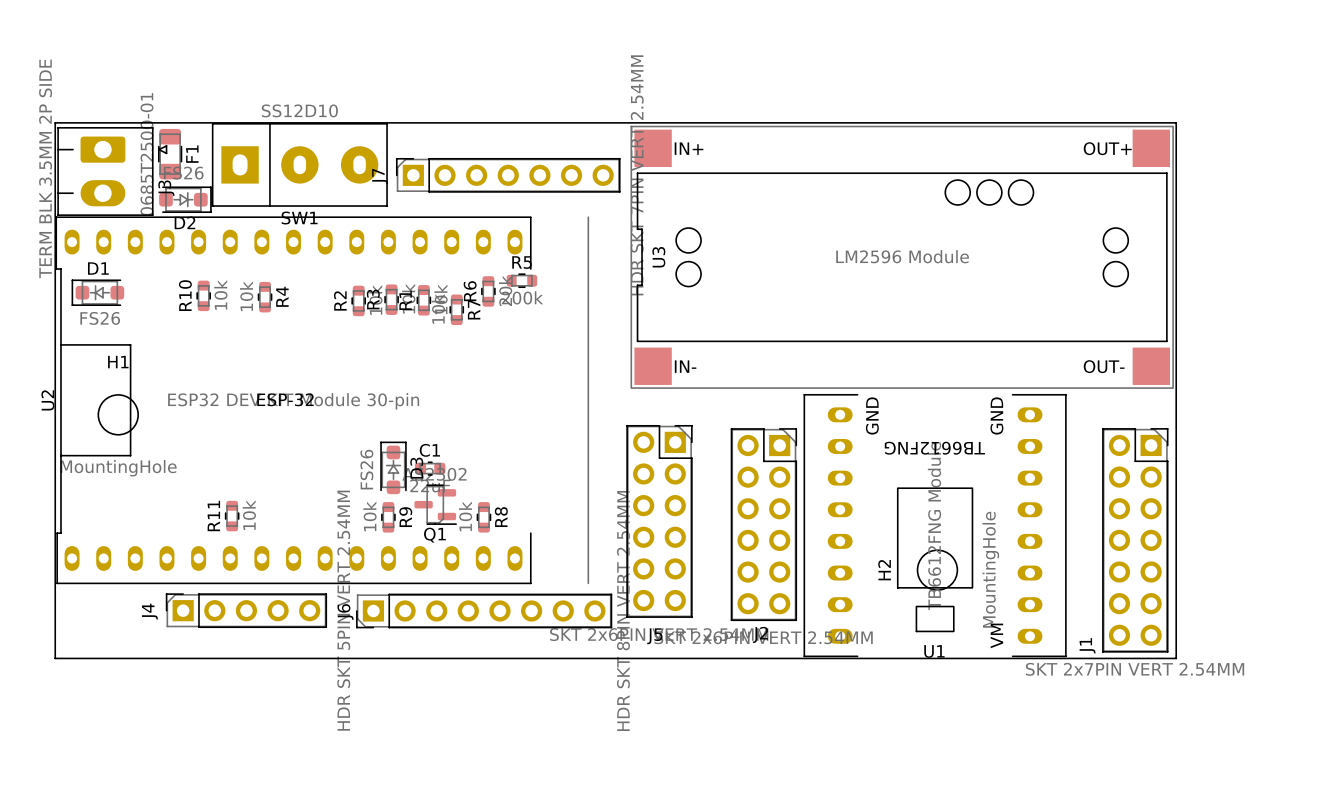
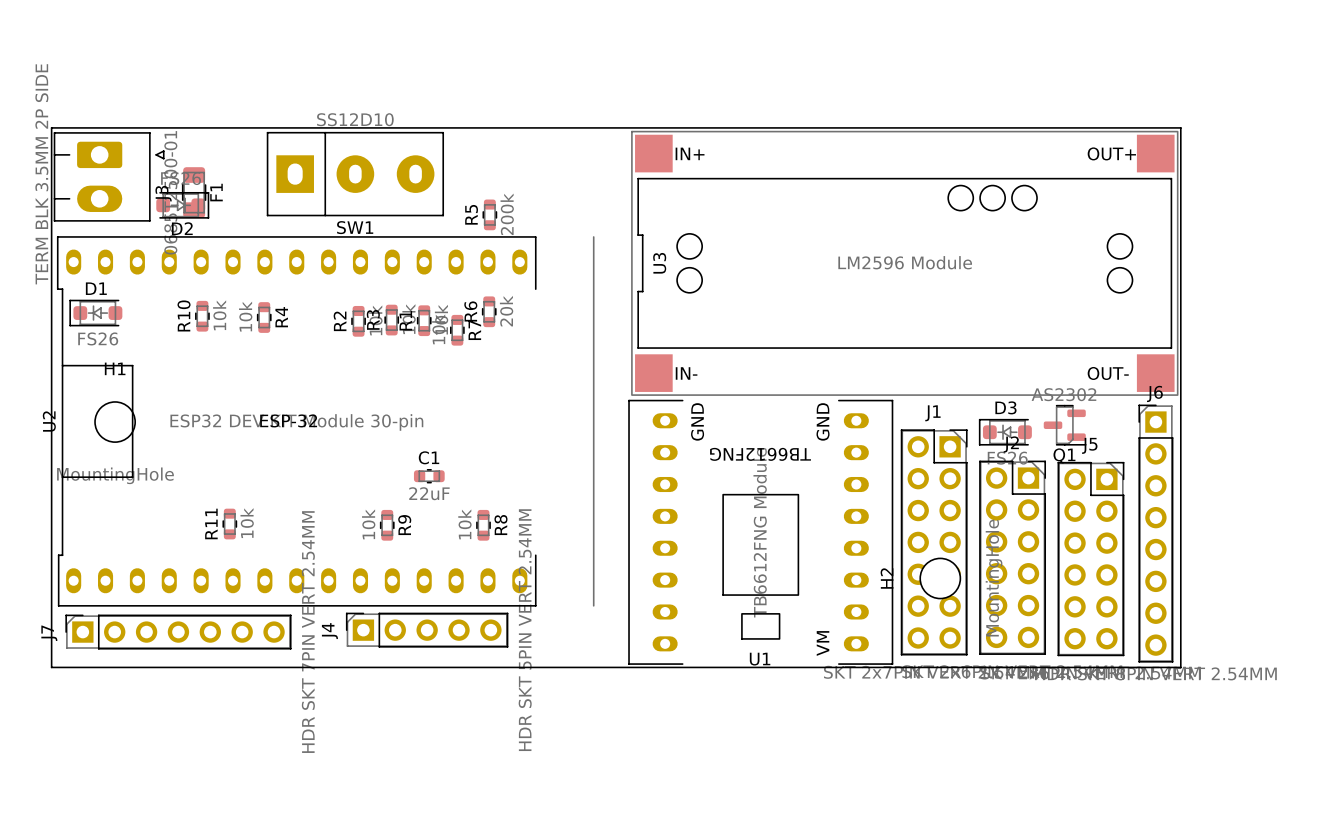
F1 position: (170, 154) -> (194, 192)
SW1 position: (299, 164) -> (355, 174)
J7 position: (508, 175) -> (178, 632)
R5 name position: R5 (522, 262) -> R5 (471, 214)
R5 rotation: 0° (521, 280) -> 90° clockwise (489, 214)
R5 position: (521, 280) -> (489, 214)
R6 position: (488, 291) -> (489, 311)
D1 position: (97, 292) -> (95, 313)
R10 position: (203, 295) -> (202, 316)
R4 position: (265, 297) -> (264, 317)
R5 value position: 200k (522, 297) -> 200k (507, 214)
R3 position: (391, 299) -> (391, 320)
R2 position: (358, 300) -> (358, 321)
R1 position: (423, 300) -> (424, 320)
R7 position: (456, 309) -> (457, 330)
U2 position: (322, 400) -> (325, 421)
D3 rotation: 0° (393, 467) -> 90° counterclockwise (1005, 432)
D3 position: (393, 467) -> (1005, 432)
Q1 position: (435, 504) -> (1065, 425)
J5 position: (659, 521) -> (1090, 559)
J2 position: (763, 524) -> (1012, 557)
U1 position: (935, 525) -> (760, 532)
J1 position: (1135, 540) -> (934, 542)
J4 position: (246, 610) -> (427, 630)
J6 rotation: 0° (484, 610) -> 90° clockwise (1155, 533)
J6 position: (484, 610) -> (1155, 533)
J2 name position: J2 (760, 634) -> J2 (1011, 444)
J5 name position: J5 (654, 636) -> J5 (1089, 445)
J1 name rotation: 0° (1087, 645) -> 90° clockwise (932, 413)
J1 name position: J1 (1087, 645) -> J1 (932, 413)

